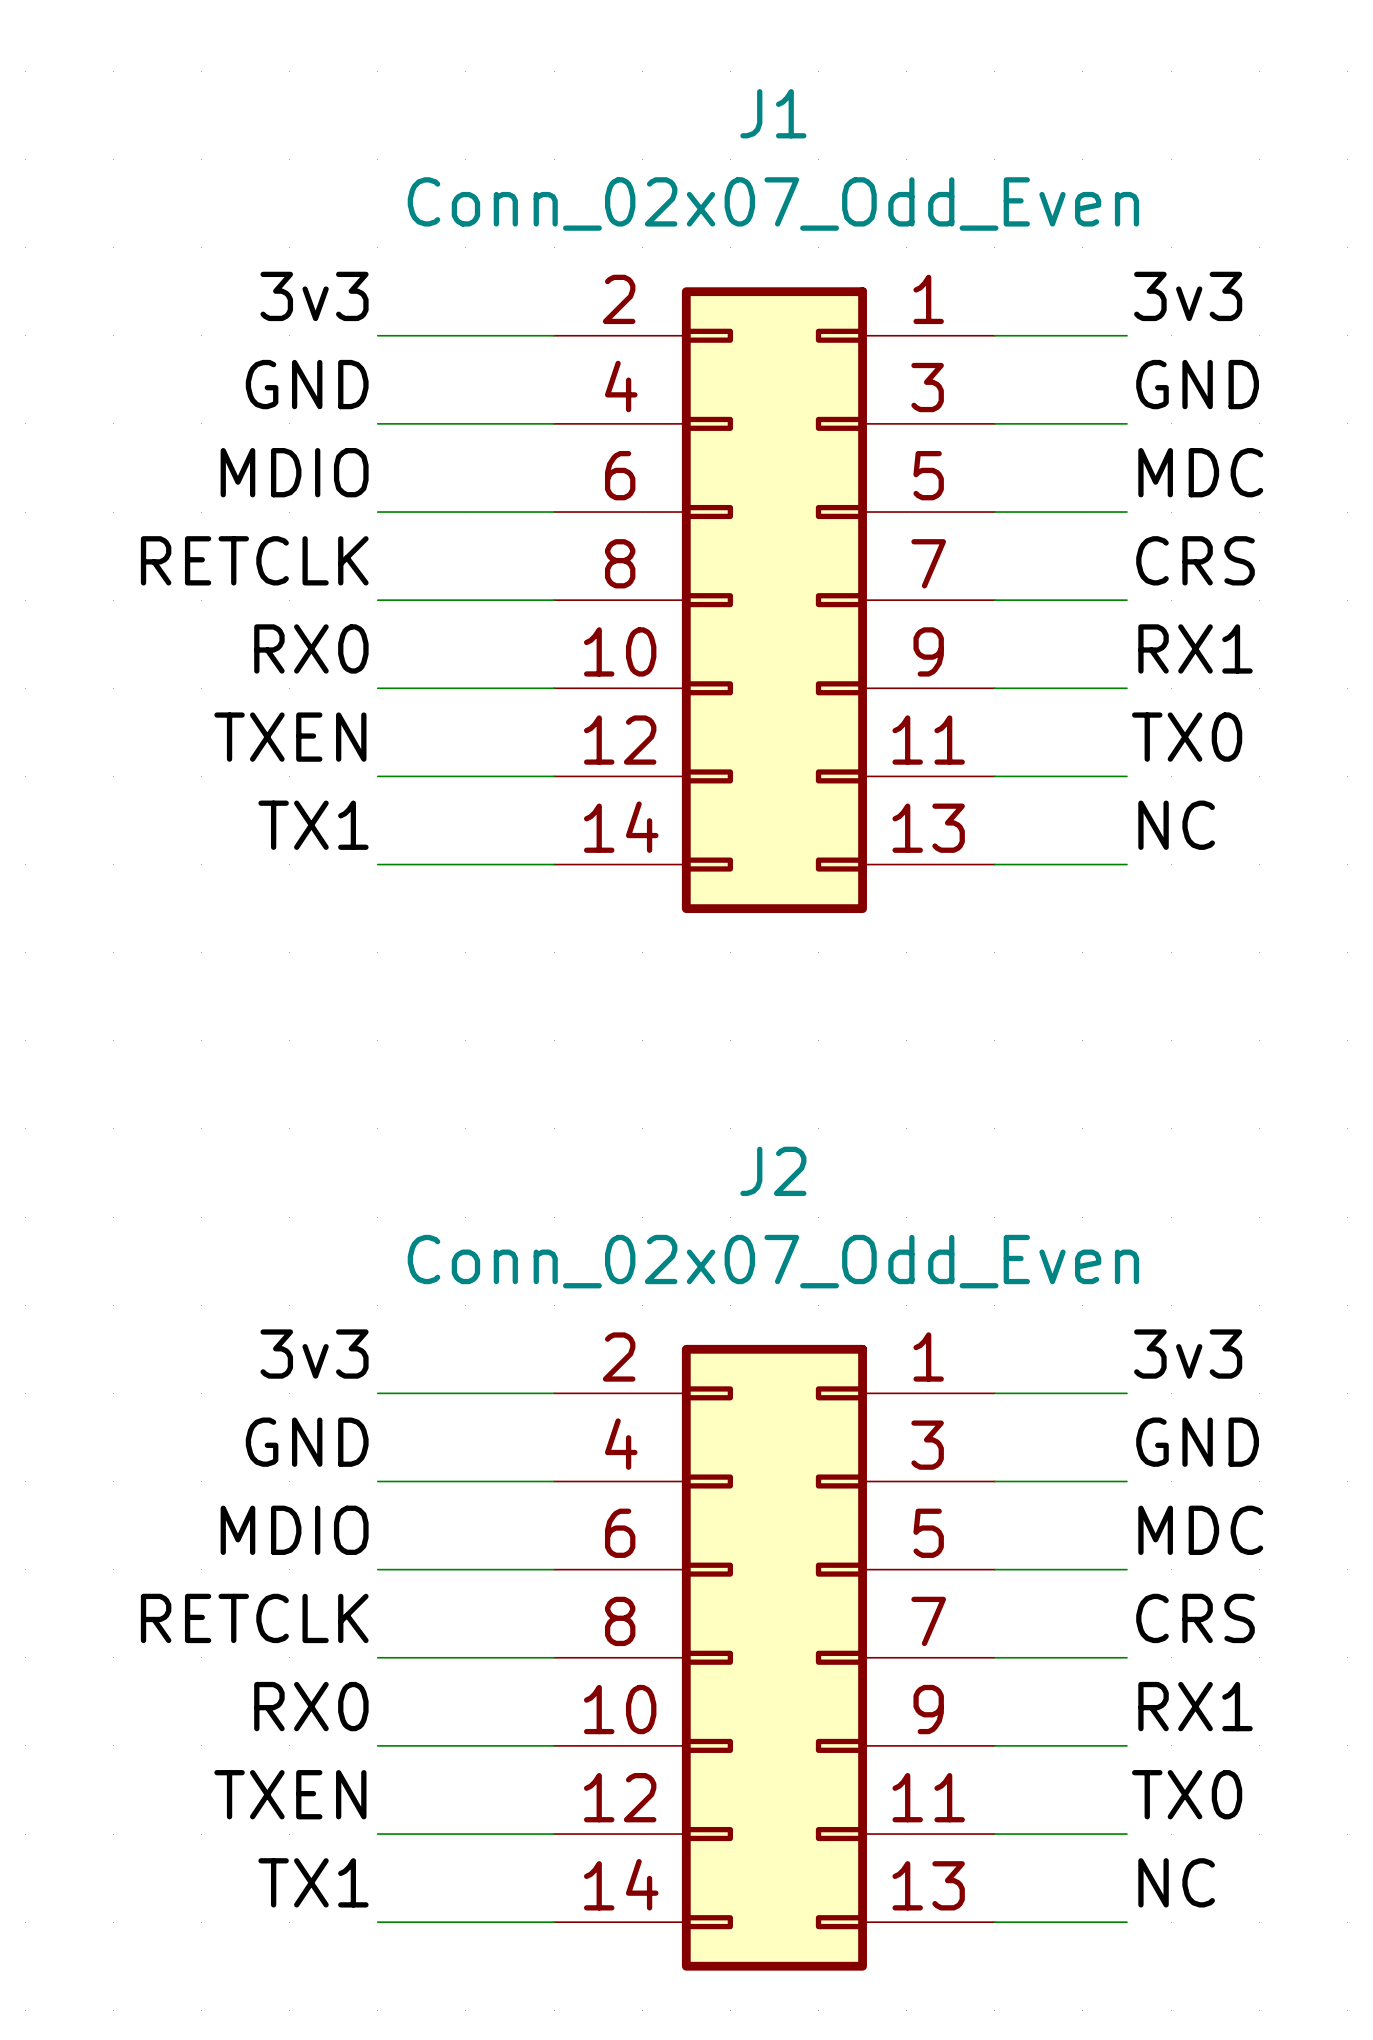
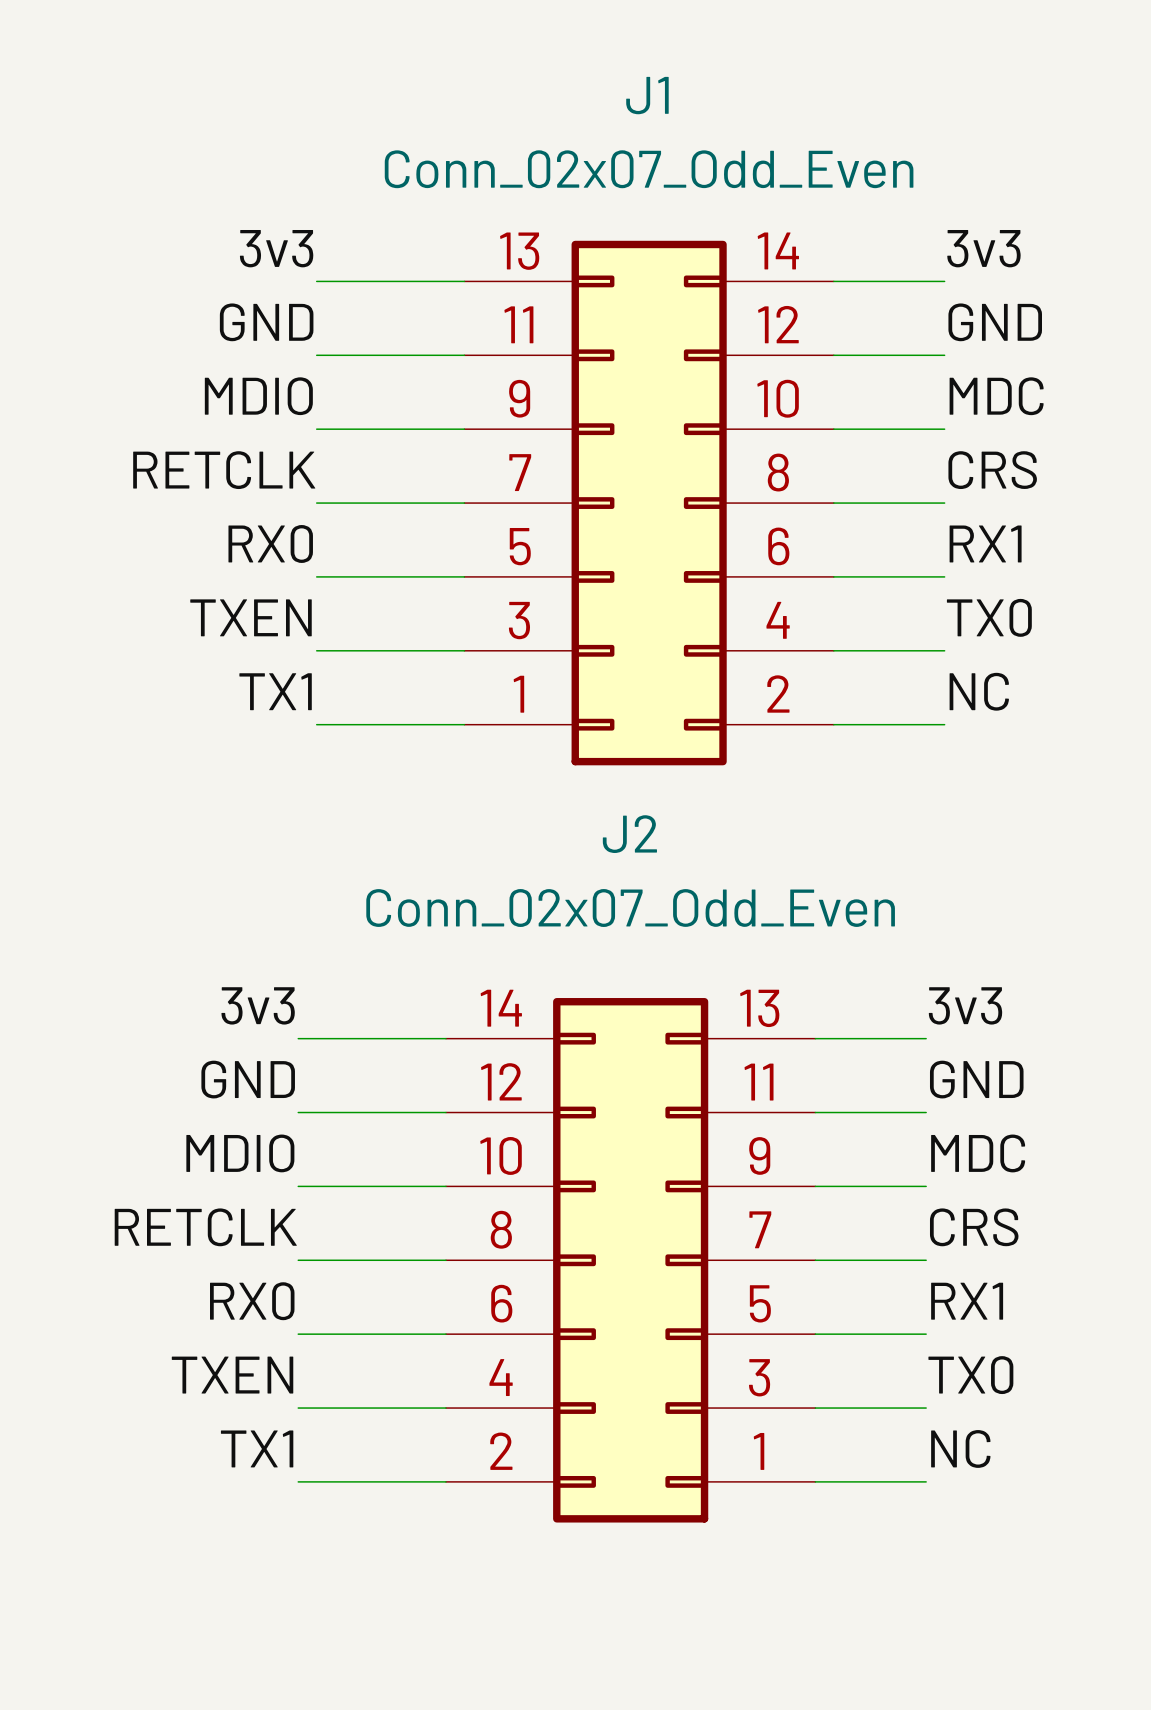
J1 rotation: 0° (774, 600) -> 180° (649, 503)
label position: 3v3 (314, 1354) -> 3v3 (258, 1005)
label position: 3v3 (1188, 1354) -> 3v3 (965, 1005)
wire: (377, 1393) (554, 1393) -> (298, 1038) (445, 1038)
wire: (994, 1393) (1126, 1393) -> (815, 1038) (926, 1038)
label position: GND (307, 1442) -> GND (248, 1079)
label position: GND (1197, 1442) -> GND (976, 1079)
wire: (377, 1481) (554, 1481) -> (298, 1112) (445, 1112)
wire: (994, 1481) (1126, 1481) -> (815, 1112) (926, 1112)
label position: MDIO (294, 1530) -> MDIO (240, 1153)
label position: MDC (1200, 1530) -> MDC (978, 1153)
wire: (377, 1569) (554, 1569) -> (298, 1186) (445, 1186)
wire: (994, 1569) (1126, 1569) -> (815, 1186) (926, 1186)
label position: RETCLK (254, 1618) -> RETCLK (205, 1227)
label position: CRS (1195, 1618) -> CRS (974, 1227)
wire: (377, 1657) (554, 1657) -> (298, 1260) (445, 1260)
J2 flip: as is (774, 1657) -> up-down (630, 1260)
wire: (994, 1657) (1126, 1657) -> (815, 1260) (926, 1260)
label position: RX0 (311, 1706) -> RX0 (252, 1301)
label position: RX1 (1195, 1706) -> RX1 (967, 1301)
wire: (377, 1745) (554, 1745) -> (298, 1334) (445, 1334)
wire: (994, 1745) (1126, 1745) -> (815, 1334) (926, 1334)
label position: TXEN (290, 1794) -> TXEN (232, 1375)
label position: TX0 (1187, 1794) -> TX0 (970, 1375)
wire: (377, 1834) (554, 1834) -> (298, 1408) (445, 1408)
wire: (994, 1834) (1126, 1834) -> (815, 1408) (926, 1408)
label position: TX1 (313, 1882) -> TX1 (257, 1448)
label position: NC (1176, 1882) -> NC (960, 1448)
wire: (377, 1922) (554, 1922) -> (298, 1481) (445, 1481)
wire: (994, 1922) (1126, 1922) -> (815, 1481) (926, 1481)

